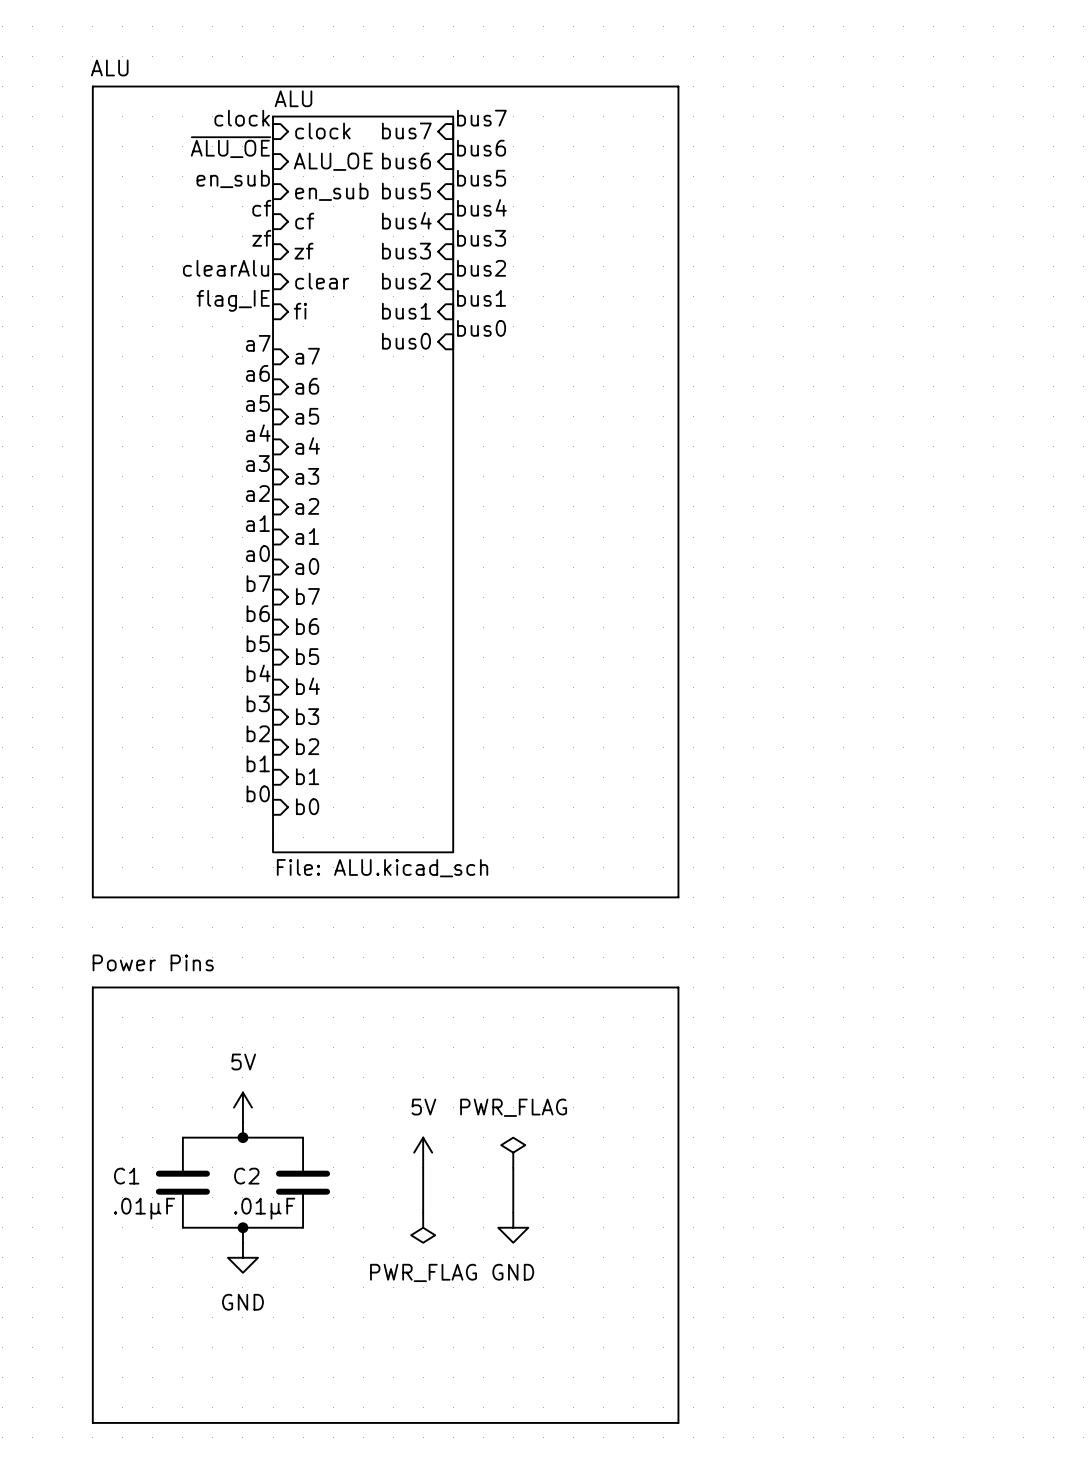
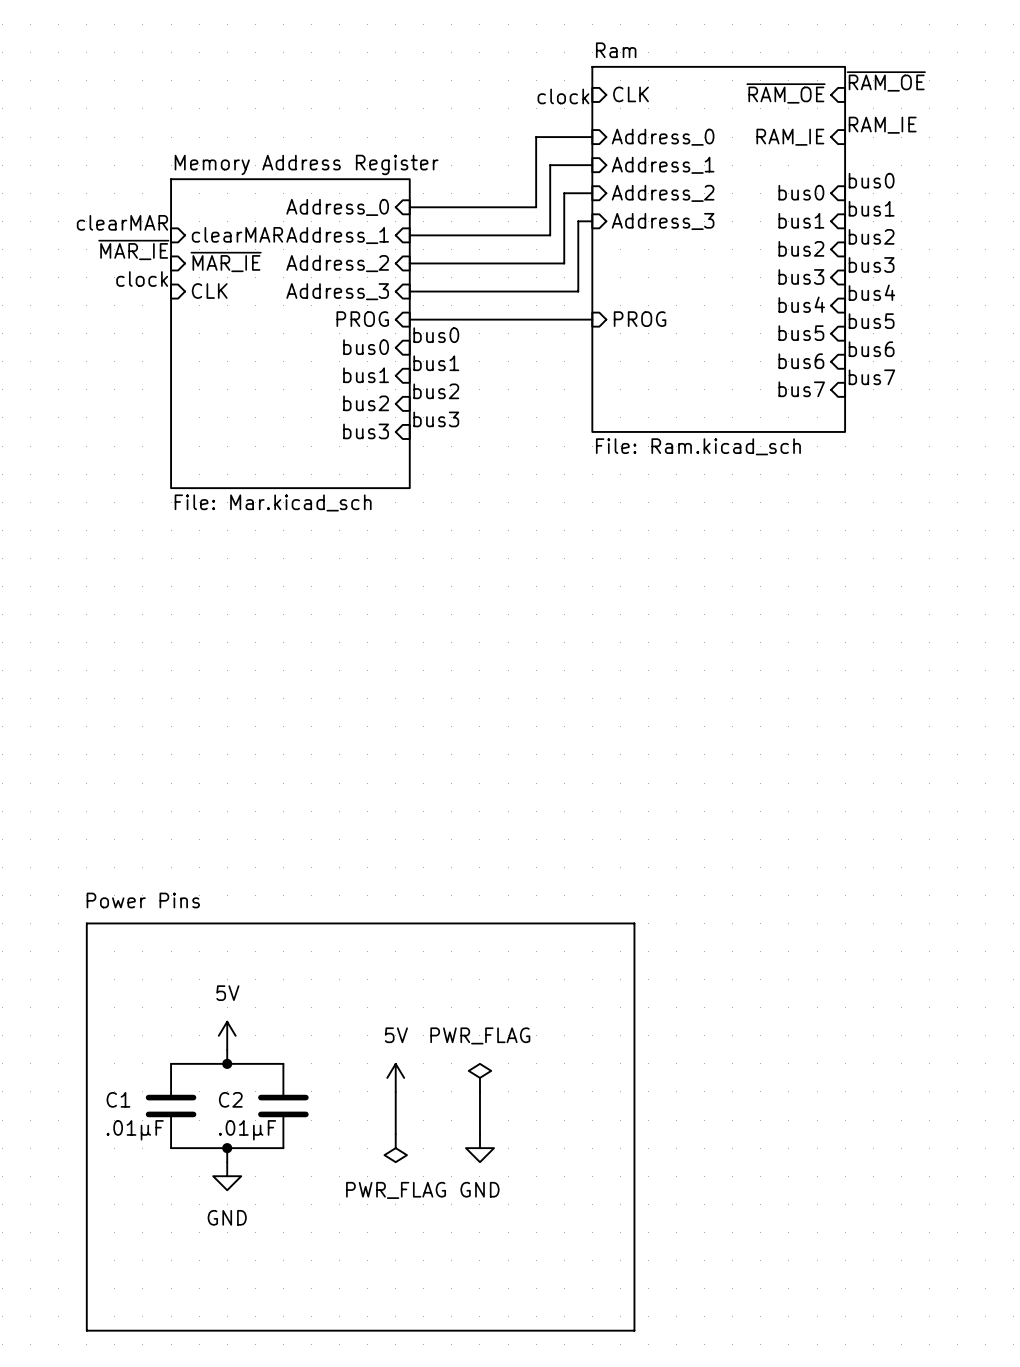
text: ALU (109, 67) -> none
line: (92, 86) (678, 86) (678, 897) (92, 897) (92, 86) -> none
label: none -> ~{RAM_OE} (886, 81)
sheet pin: none -> ~{RAM_OE} (786, 93)
sheet pin: none -> CLK (630, 94)
label: none -> clock (563, 96)
label: clock (242, 118) -> none
label: bus7 (481, 118) -> none
sheet pin: clock (322, 131) -> none
sheet pin: bus7 (406, 131) -> none
label: none -> RAM_IE (882, 125)
wire: none -> (592, 137) (536, 137) (536, 207) (409, 207)
sheet pin: none -> Address_0 (663, 137)
sheet pin: none -> RAM_IE (790, 137)
label: ~{ALU_OE} (231, 147) -> none
label: bus6 (481, 148) -> none
sheet pin: ALU_OE (333, 161) -> none
sheet pin: bus6 (406, 161) -> none
wire: none -> (592, 165) (550, 165) (550, 235) (409, 235)
sheet pin: none -> Address_1 (663, 165)
label: en_sub (233, 178) -> none
label: bus5 (481, 178) -> none
sheet pin: en_sub (331, 191) -> none
sheet pin: bus5 (406, 191) -> none
label: none -> bus0 (871, 180)
wire: none -> (592, 193) (564, 193) (564, 263) (409, 263)
sheet pin: none -> Address_2 (663, 193)
sheet pin: none -> bus0 (801, 192)
label: bus4 (481, 207) -> none
label: cf (261, 208) -> none
sheet pin: bus4 (406, 220) -> none
sheet pin: cf (304, 221) -> none
sheet pin: none -> Address_0 (337, 207)
label: none -> bus1 (871, 208)
wire: none -> (592, 221) (578, 221) (578, 291) (409, 291)
sheet pin: none -> Address_3 (663, 221)
sheet pin: none -> bus1 (801, 220)
label: zf (261, 238) -> none
label position: bus3 (481, 238) -> bus3 (436, 419)
sheet pin: zf (303, 251) -> none
sheet pin: none -> Address_1 (337, 235)
sheet pin position: bus3 (406, 251) -> bus3 (366, 431)
label: none -> bus2 (871, 236)
sheet Ram: none -> File: Ram.kicad_sch (718, 249)
sheet pin: none -> bus2 (801, 248)
label: none -> ~{MAR_IE} (133, 249)
label: clearAlu (226, 268) -> clearMAR (122, 222)
label position: bus2 (481, 268) -> bus2 (436, 391)
sheet pin: none -> ~{MAR_IE} (226, 261)
sheet pin: clear (322, 281) -> clearMAR (237, 234)
sheet pin: none -> Address_2 (337, 263)
sheet pin position: bus2 (406, 281) -> bus2 (366, 403)
label: none -> bus3 (871, 264)
sheet pin: none -> bus3 (801, 276)
label: none -> clock (142, 279)
label position: bus1 (481, 298) -> bus1 (436, 363)
label: flag_IE (233, 300) -> none
sheet pin: none -> CLK (209, 291)
sheet pin: fi (300, 311) -> none
sheet pin: none -> Address_3 (337, 291)
sheet pin position: bus1 (406, 311) -> bus1 (366, 375)
label: none -> bus4 (871, 292)
sheet pin: none -> bus4 (801, 304)
label position: bus0 (481, 328) -> bus0 (436, 335)
sheet pin: none -> PROG (362, 319)
sheet pin position: bus0 (406, 341) -> bus0 (366, 347)
wire: none -> (409, 319) (592, 319)
sheet pin: none -> PROG (640, 319)
label: a7 (258, 343) -> none
label: none -> bus5 (871, 321)
sheet pin: a7 (307, 356) -> none
sheet Memory Address Register: none -> File: Mar.kicad_sch (290, 333)
sheet pin: none -> bus5 (801, 333)
label: a6 (257, 373) -> none
label: none -> bus6 (871, 349)
sheet pin: a6 (307, 386) -> none
sheet pin: none -> bus6 (801, 361)
label: a5 (257, 403) -> none
label: none -> bus7 (871, 377)
sheet pin: a5 (307, 416) -> none
sheet pin: none -> bus7 (801, 389)
label: a4 (258, 433) -> none
sheet pin: a4 (307, 445) -> none
label: a3 (257, 463) -> none
sheet pin: a3 (307, 476) -> none
sheet ALU: File: ALU.kicad_sch (363, 484) -> none
label: a2 (257, 493) -> none
sheet pin: a2 (307, 506) -> none
label: a1 (257, 523) -> none
sheet pin: a1 (307, 536) -> none
label: a0 (257, 553) -> none
sheet pin: a0 (307, 566) -> none
label: b7 (258, 583) -> none
sheet pin: b7 (307, 596) -> none
label: b6 (258, 613) -> none
sheet pin: b6 (307, 626) -> none
label: b5 (258, 643) -> none
sheet pin: b5 (307, 656) -> none
label: b4 (258, 673) -> none
sheet pin: b4 (307, 686) -> none
label: b3 (258, 703) -> none
sheet pin: b3 (307, 716) -> none
label: b2 (258, 733) -> none
sheet pin: b2 (307, 746) -> none
label: b1 (258, 763) -> none
sheet pin: b1 (307, 776) -> none
label: b0 (258, 793) -> none
sheet pin: b0 (307, 806) -> none

